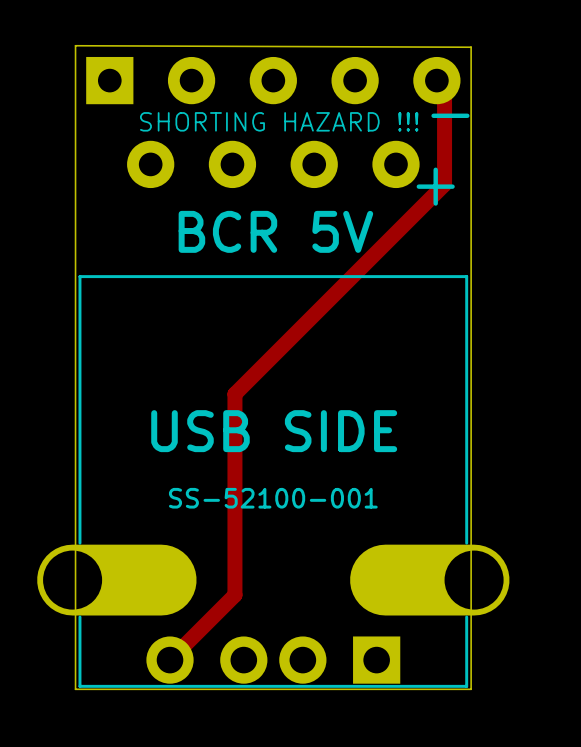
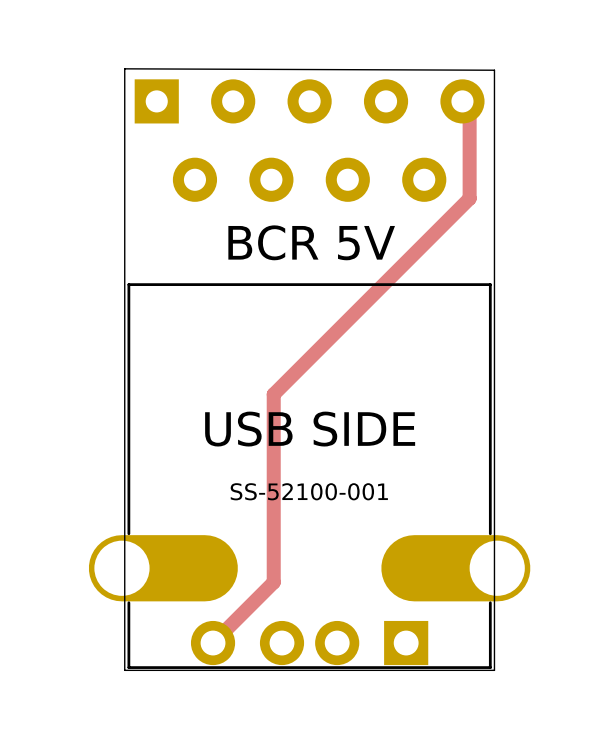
text: - (450, 115) -> none
text: SHORTING HAZARD !!! (279, 121) -> none
text: + (435, 186) -> none

